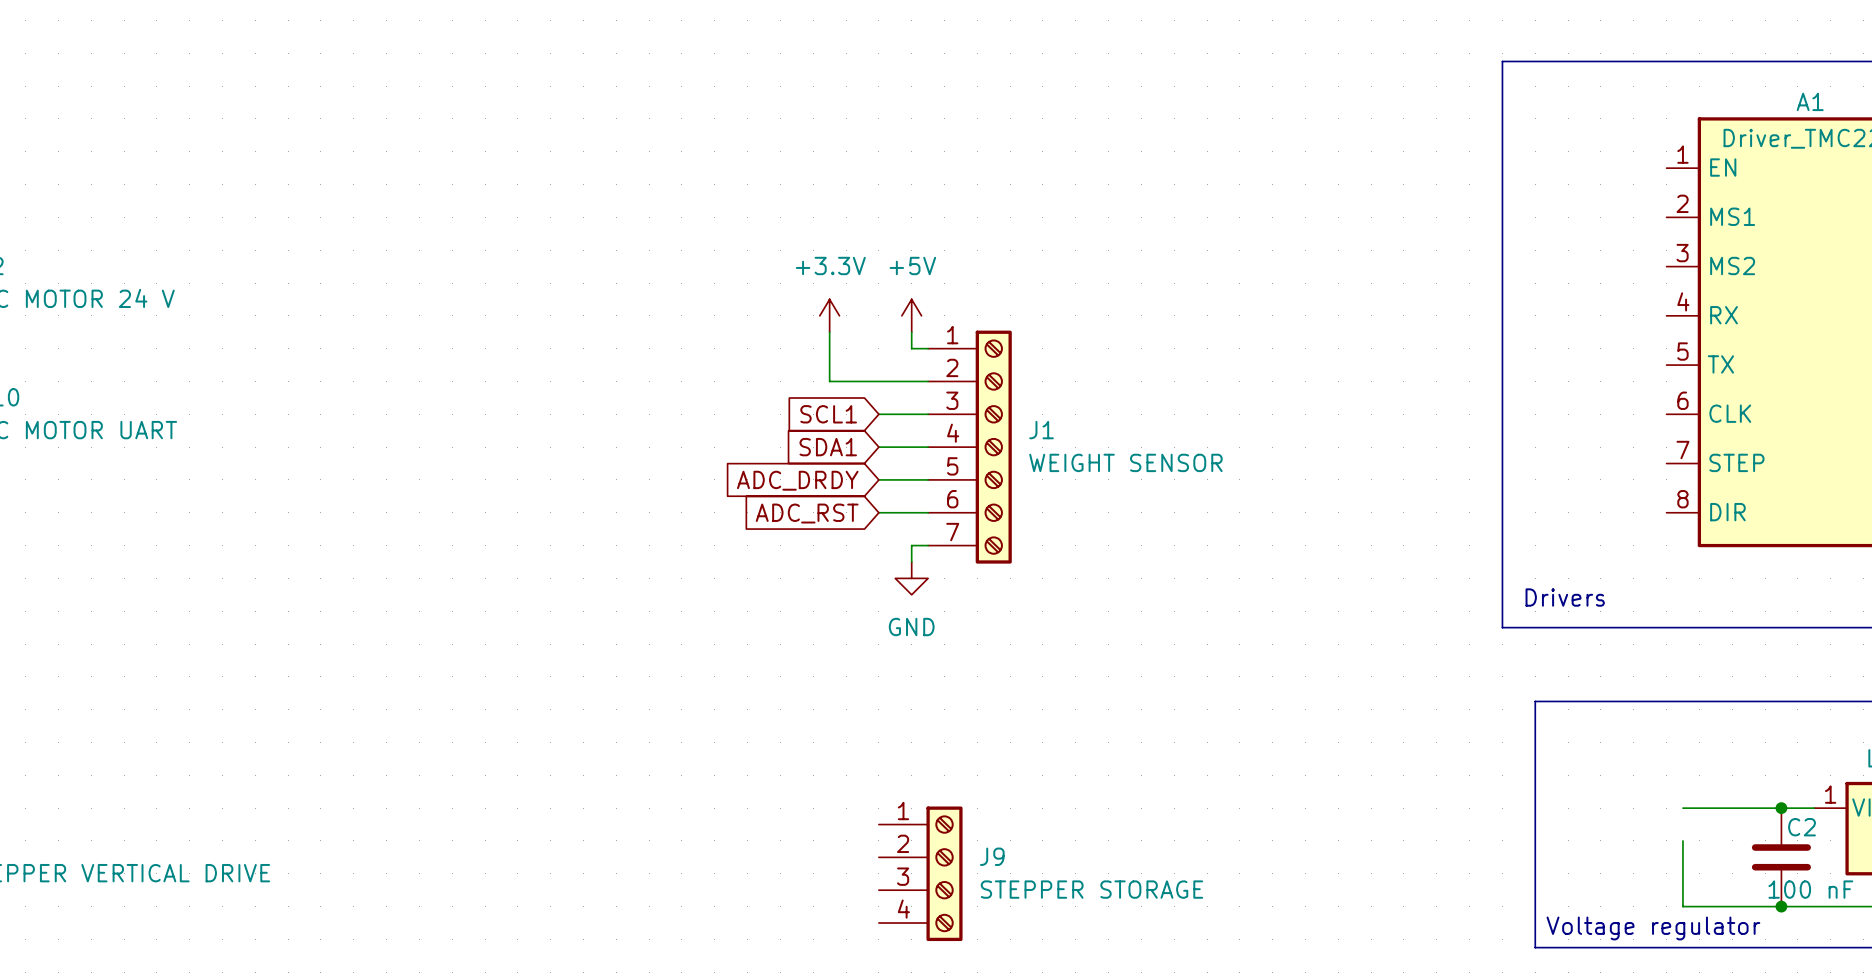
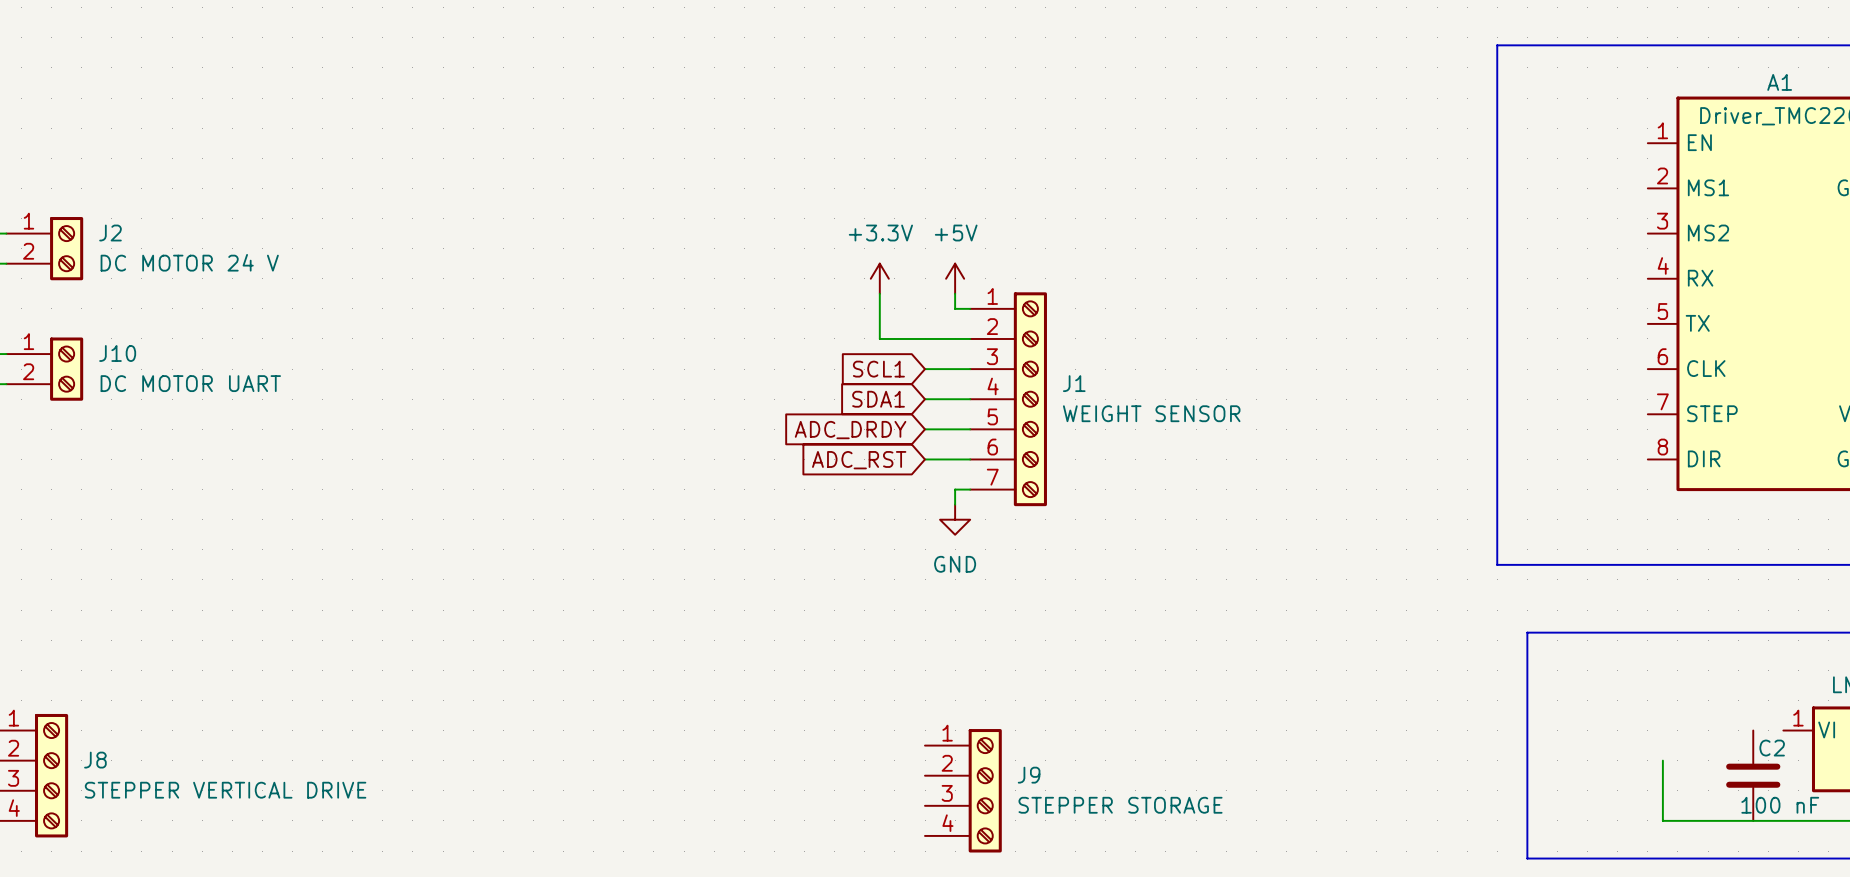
text: Drivers (1565, 597) -> none
wire: (1682, 808) (1814, 808) -> none
junction: (1781, 808) -> none
junction: (1781, 906) -> none
text: Voltage regulator (1653, 928) -> none

